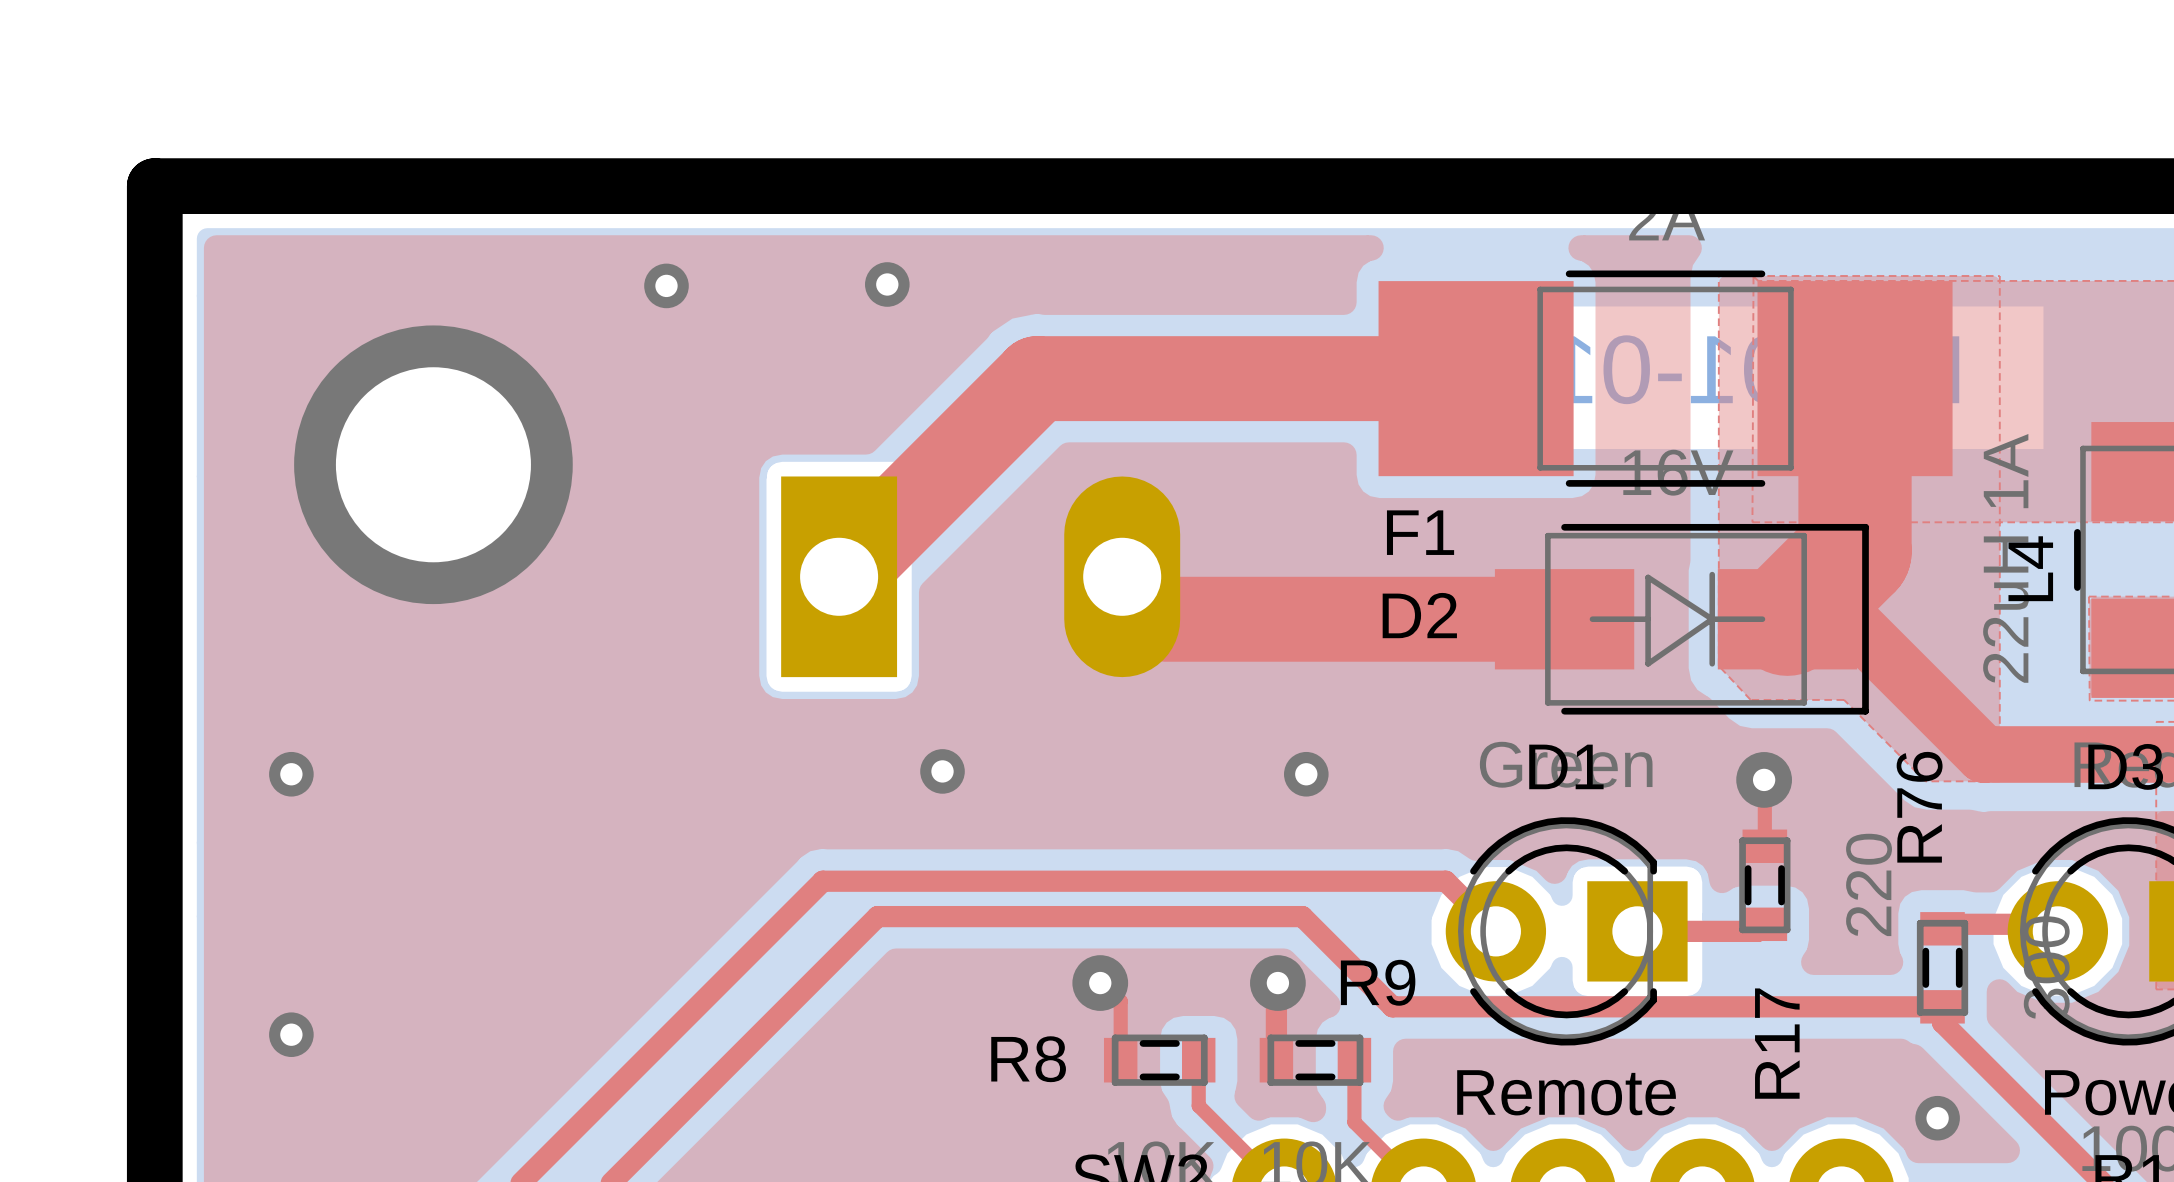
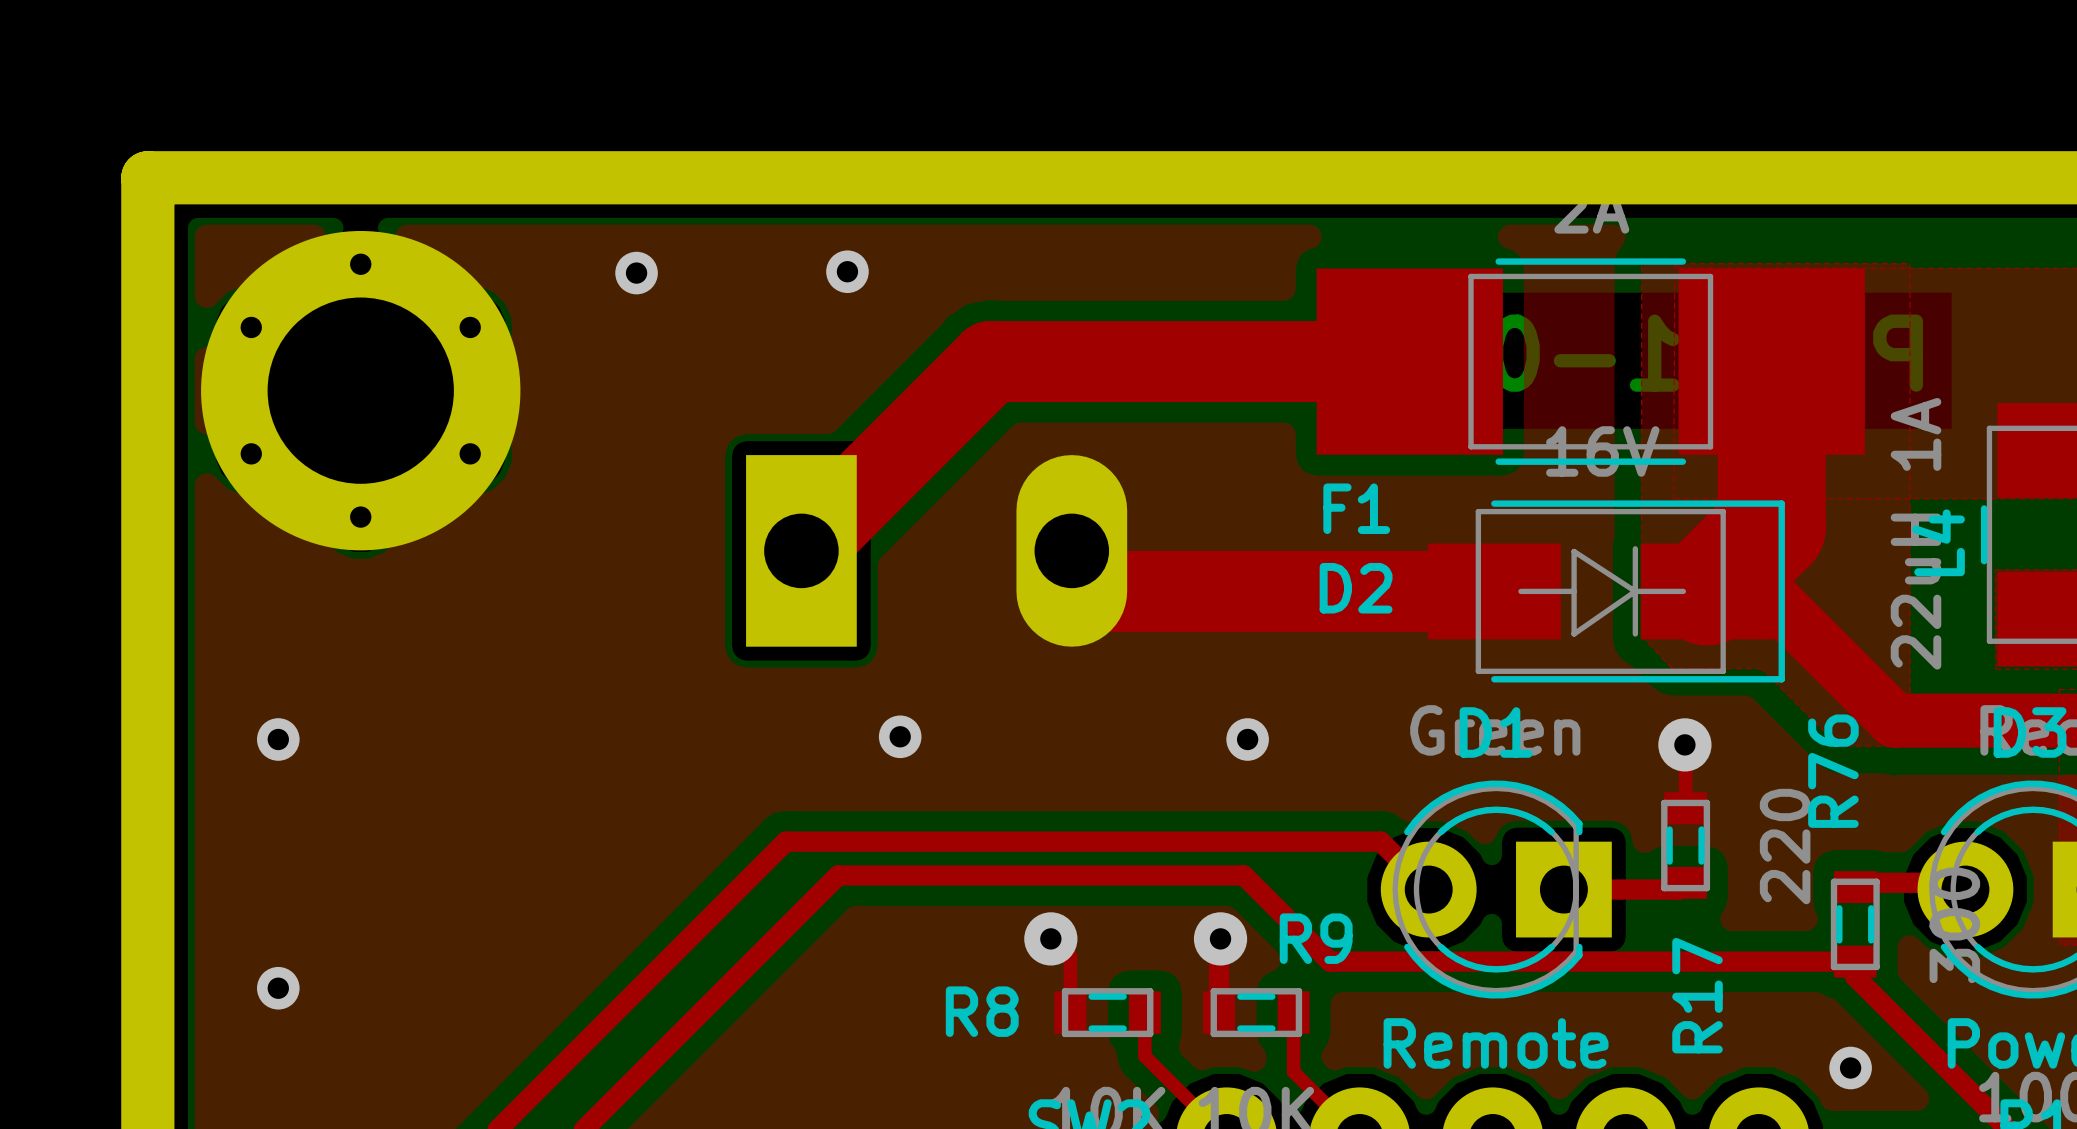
part: none -> (360, 390)
via: (433, 464) -> none

